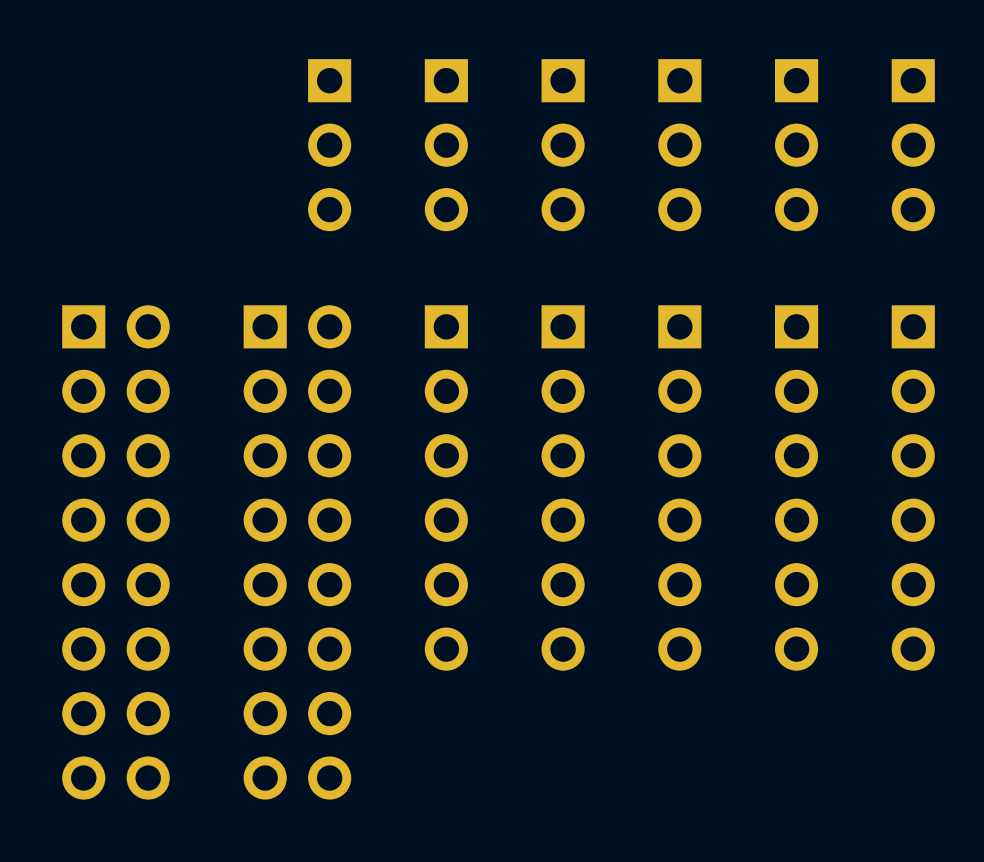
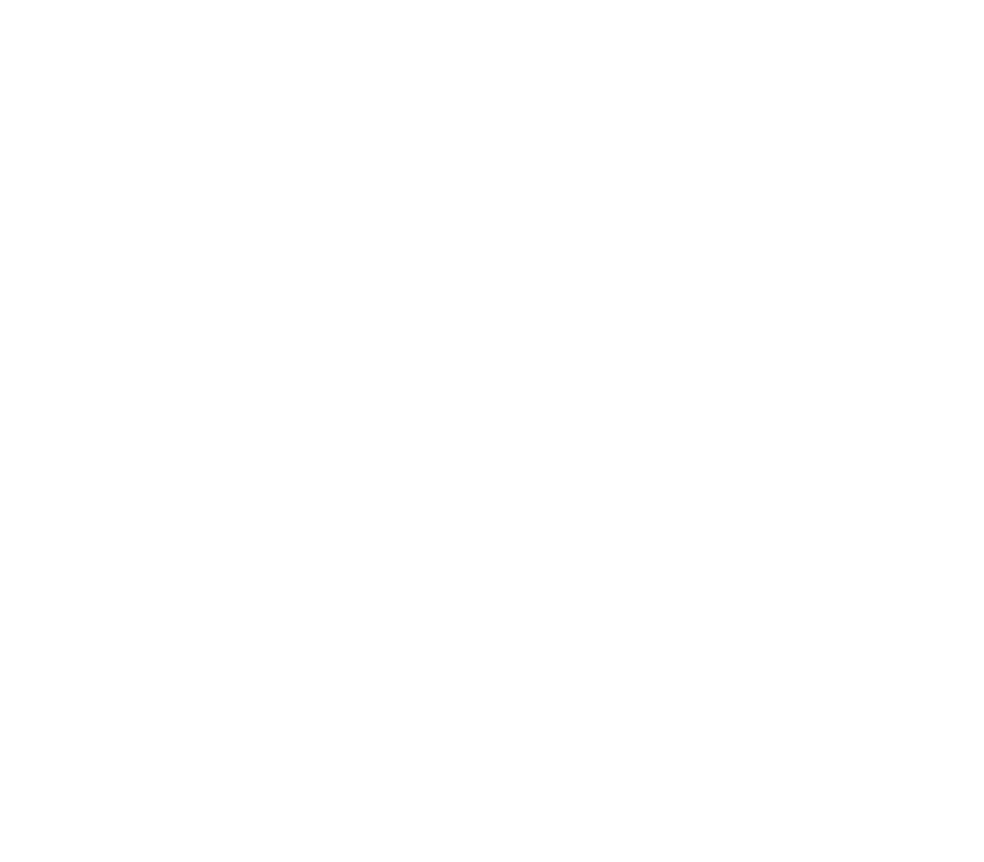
part: (329, 145) -> none
part: (446, 145) -> none
part: (563, 145) -> none
part: (679, 145) -> none
part: (796, 145) -> none
part: (913, 145) -> none
part: (446, 487) -> none
part: (563, 487) -> none
part: (679, 487) -> none
part: (796, 487) -> none
part: (913, 487) -> none
part: (115, 552) -> none
part: (297, 552) -> none

